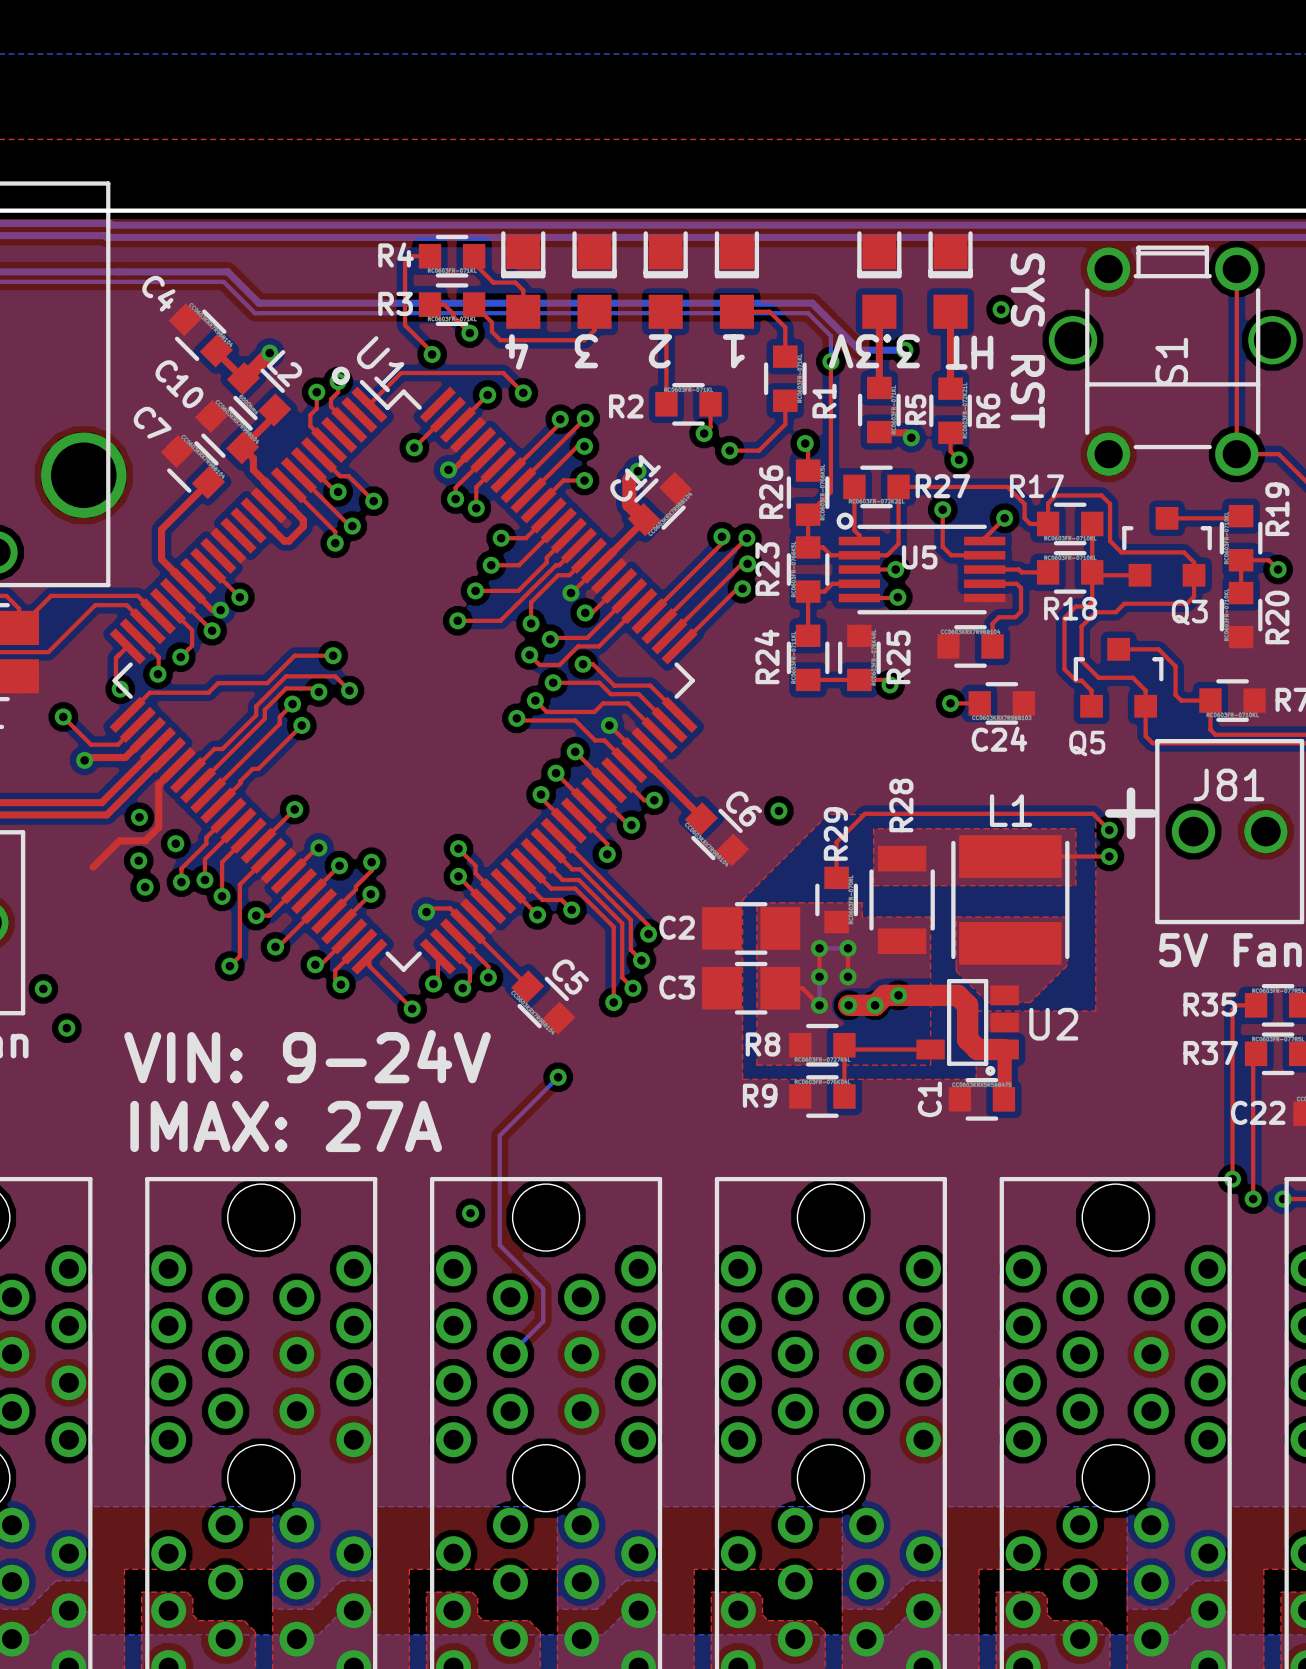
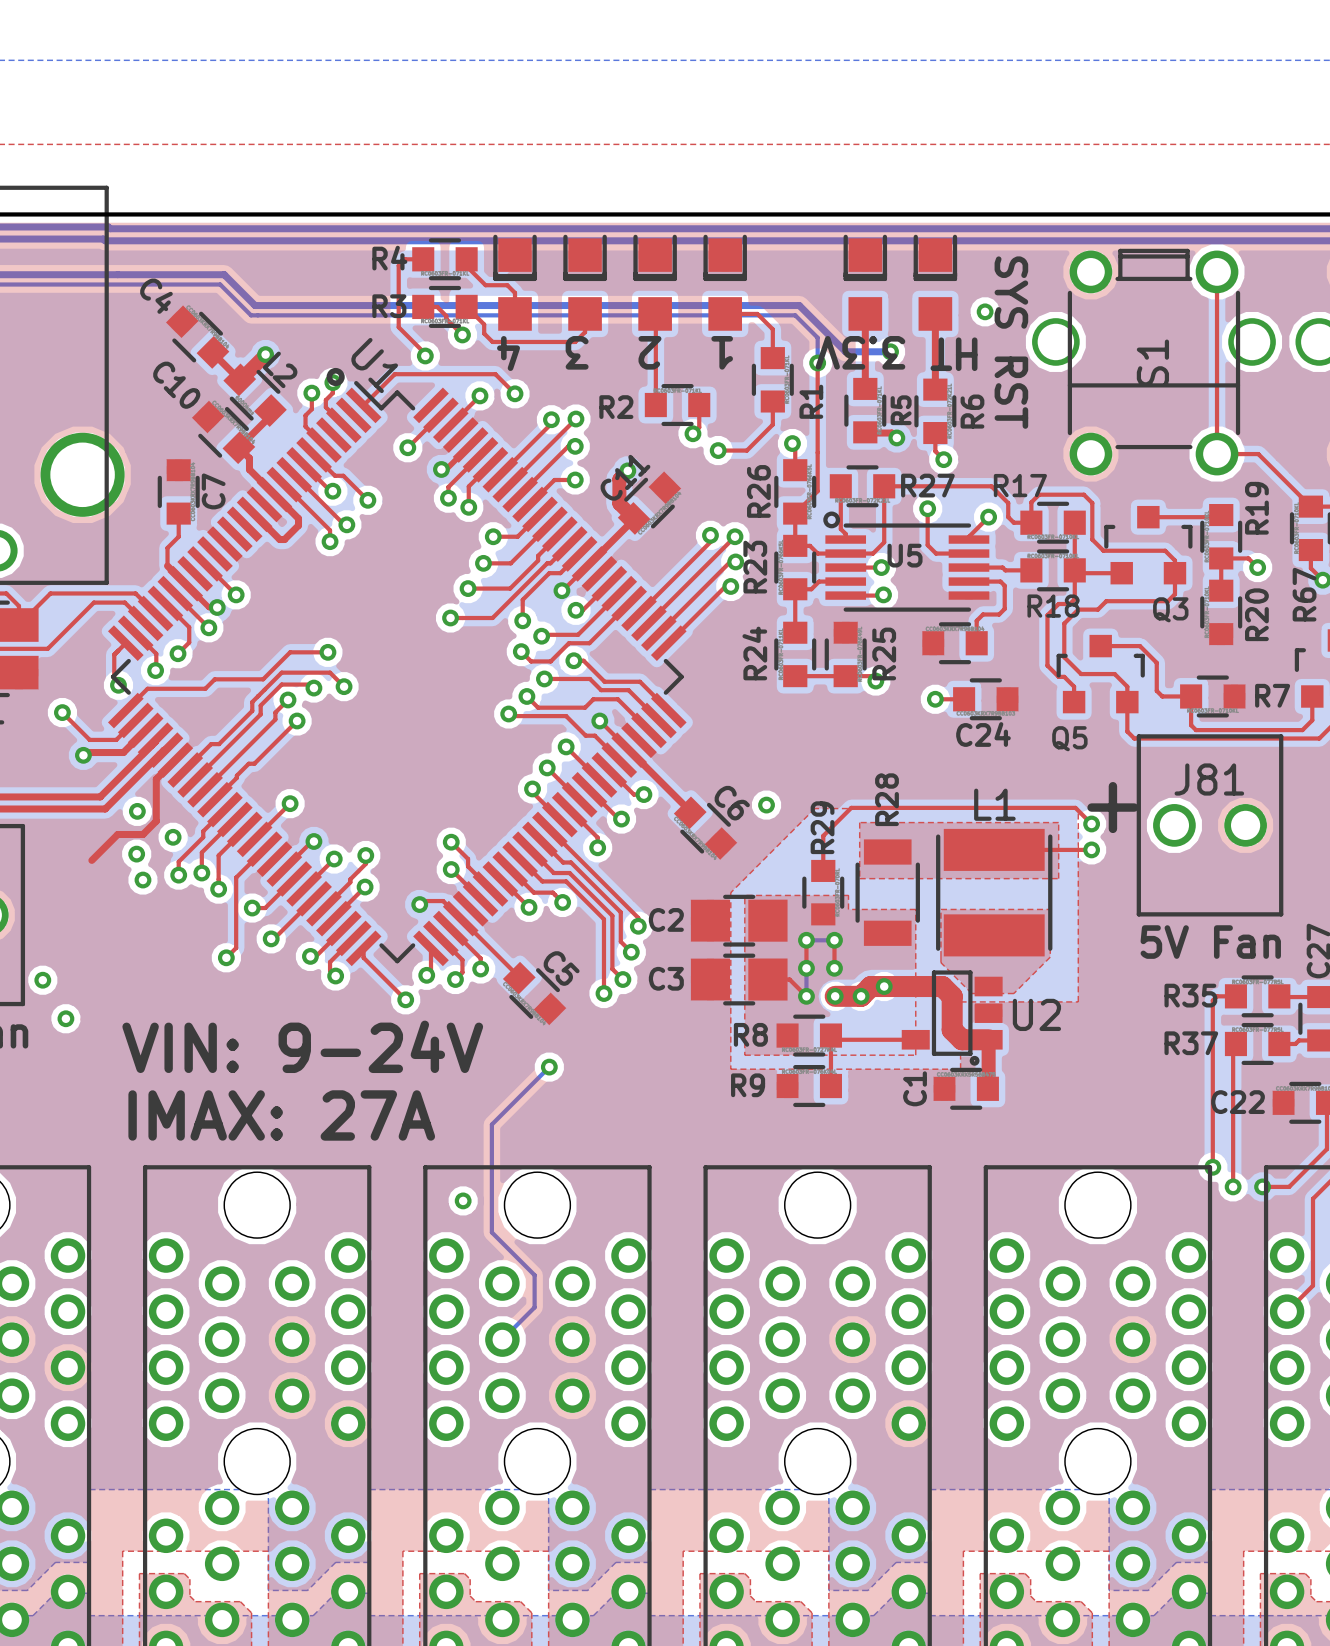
C7 name position: C7 (152, 422) -> C7 (213, 491)
C7 rotation: 0° (192, 466) -> 45° clockwise (178, 491)
top track: (208, 482) (161, 529) (161, 559) (170, 567) -> (178, 513) (178, 536) (167, 547) (167, 565)

